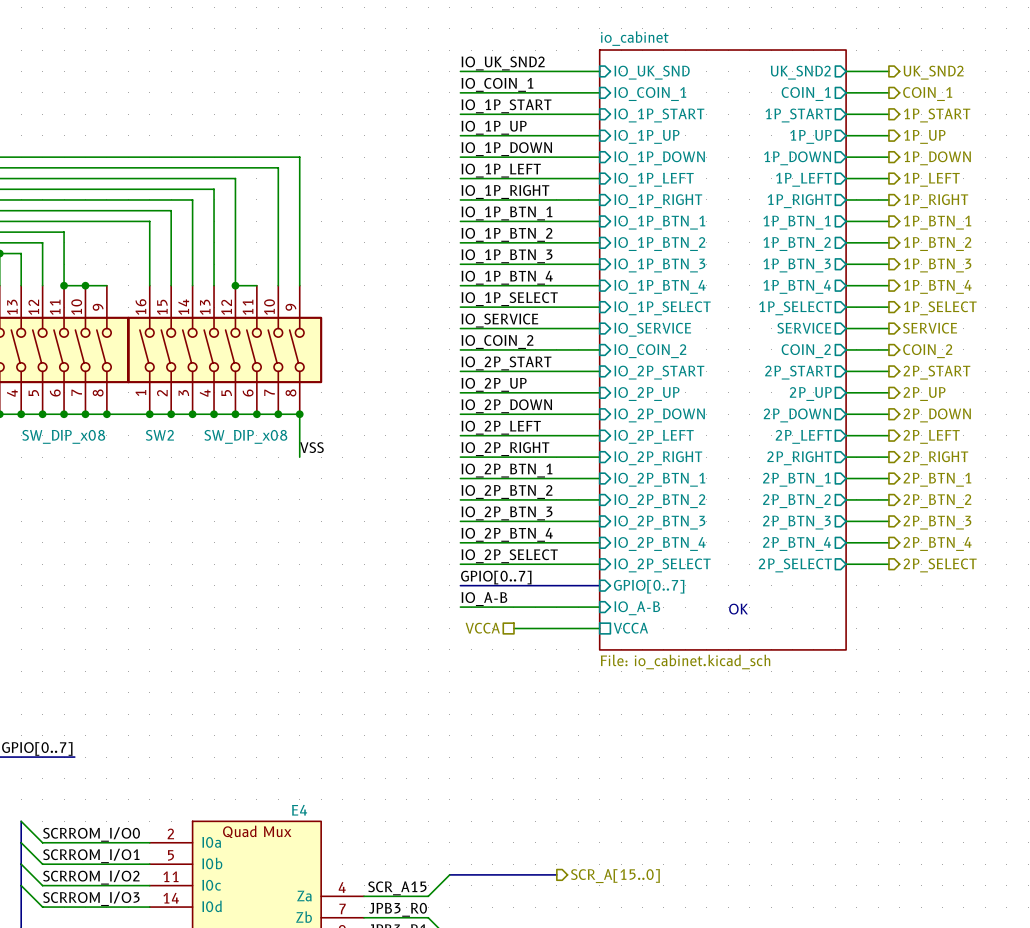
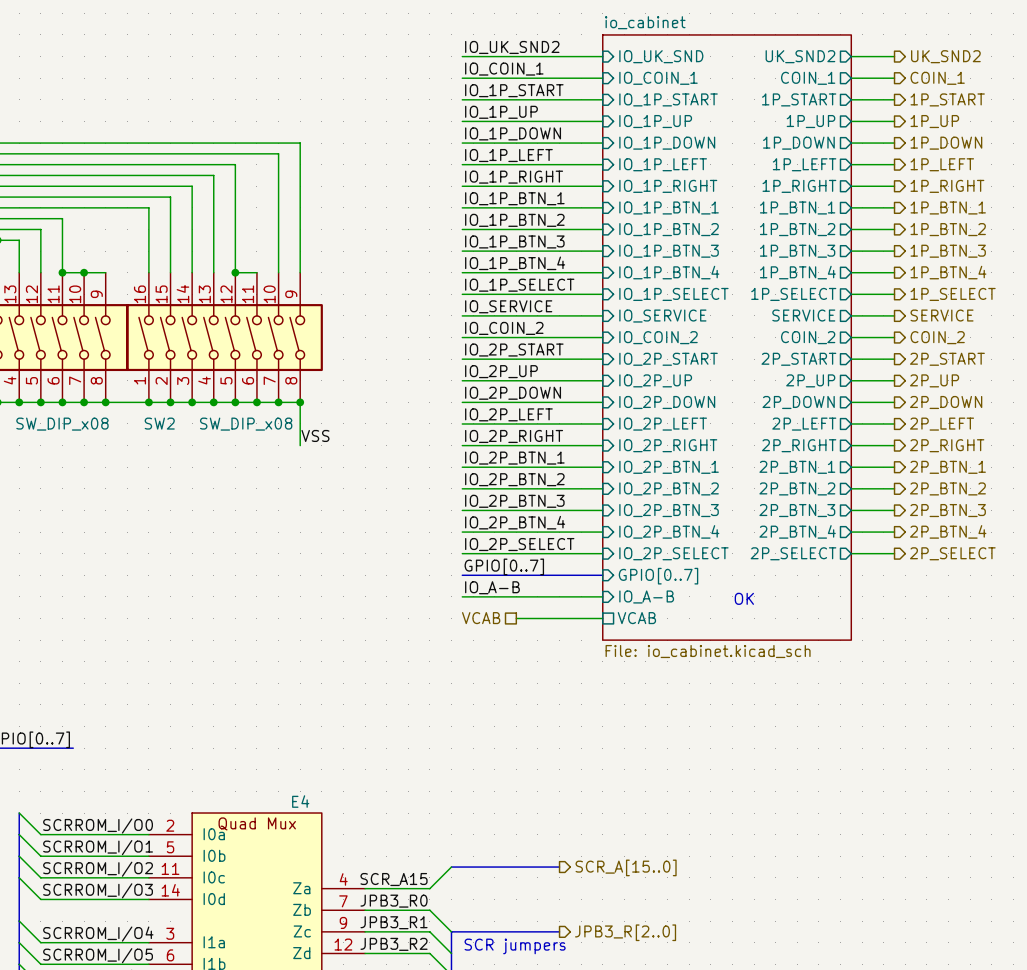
hierarchical label: VCCA (482, 628) -> VCAB (481, 618)
sheet pin: VCCA (630, 628) -> VCAB (636, 618)

